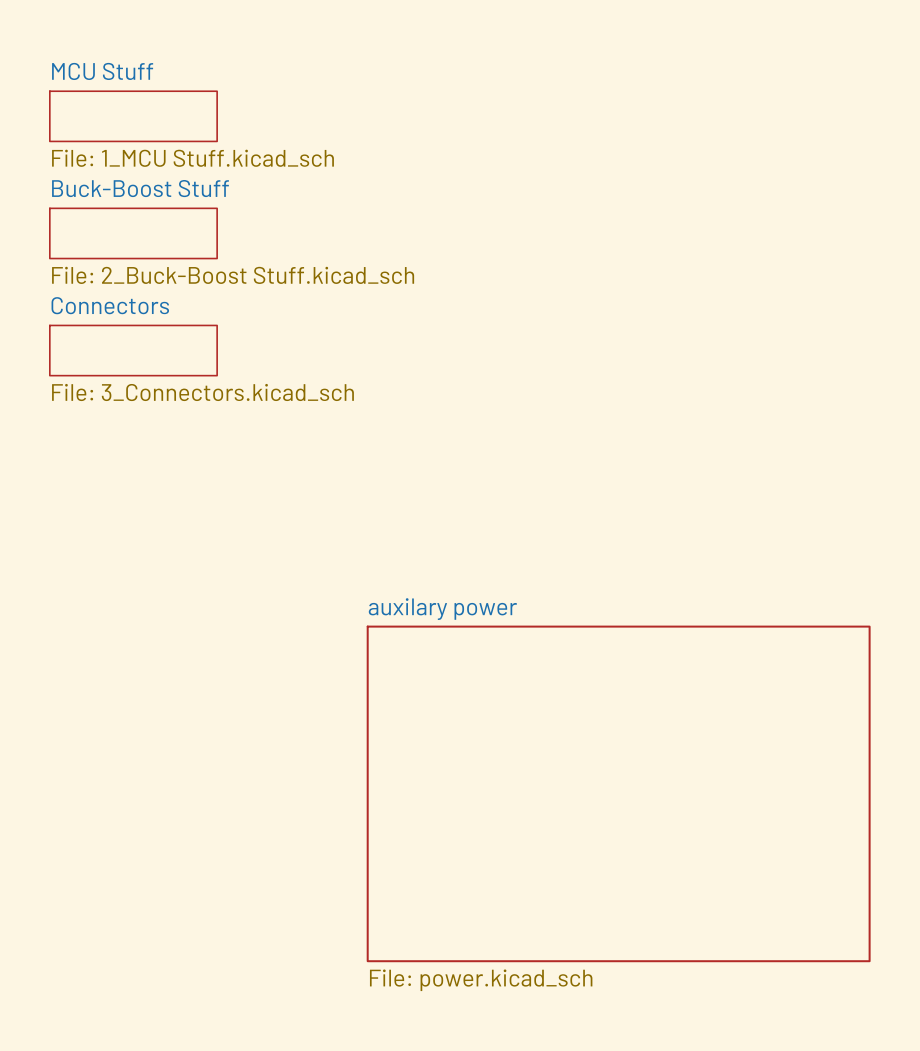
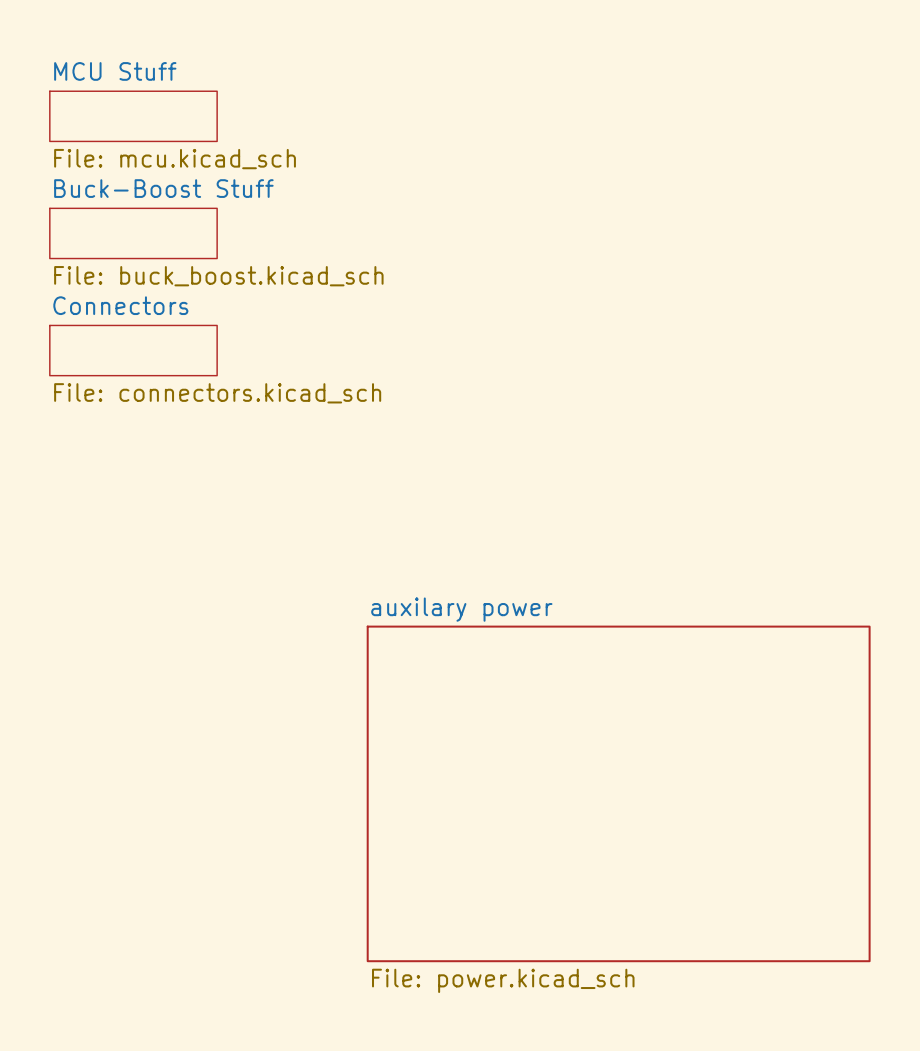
sheet MCU Stuff value: File: 1_MCU Stuff.kicad_sch (192, 158) -> File: mcu.kicad_sch (175, 159)
sheet Buck-Boost Stuff value: File: 2_Buck-Boost Stuff.kicad_sch (233, 275) -> File: buck_boost.kicad_sch (218, 276)
sheet Connectors value: File: 3_Connectors.kicad_sch (202, 392) -> File: connectors.kicad_sch (217, 393)

